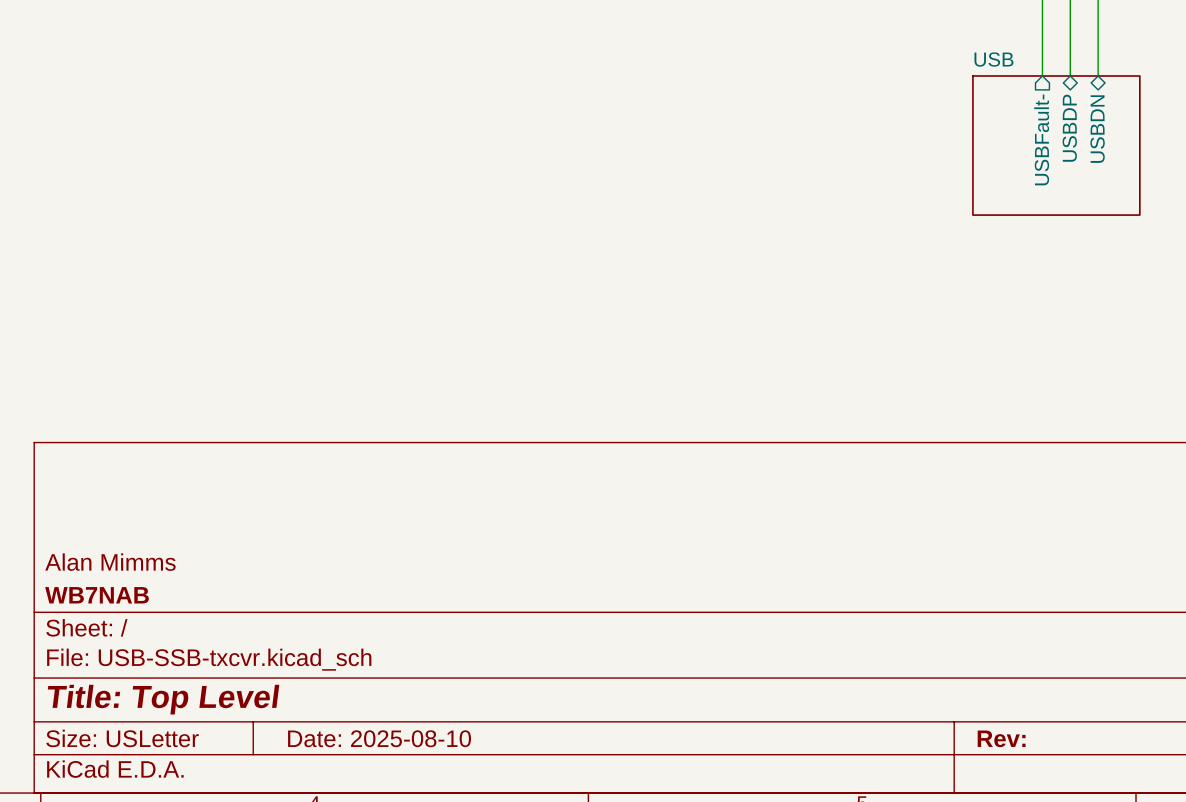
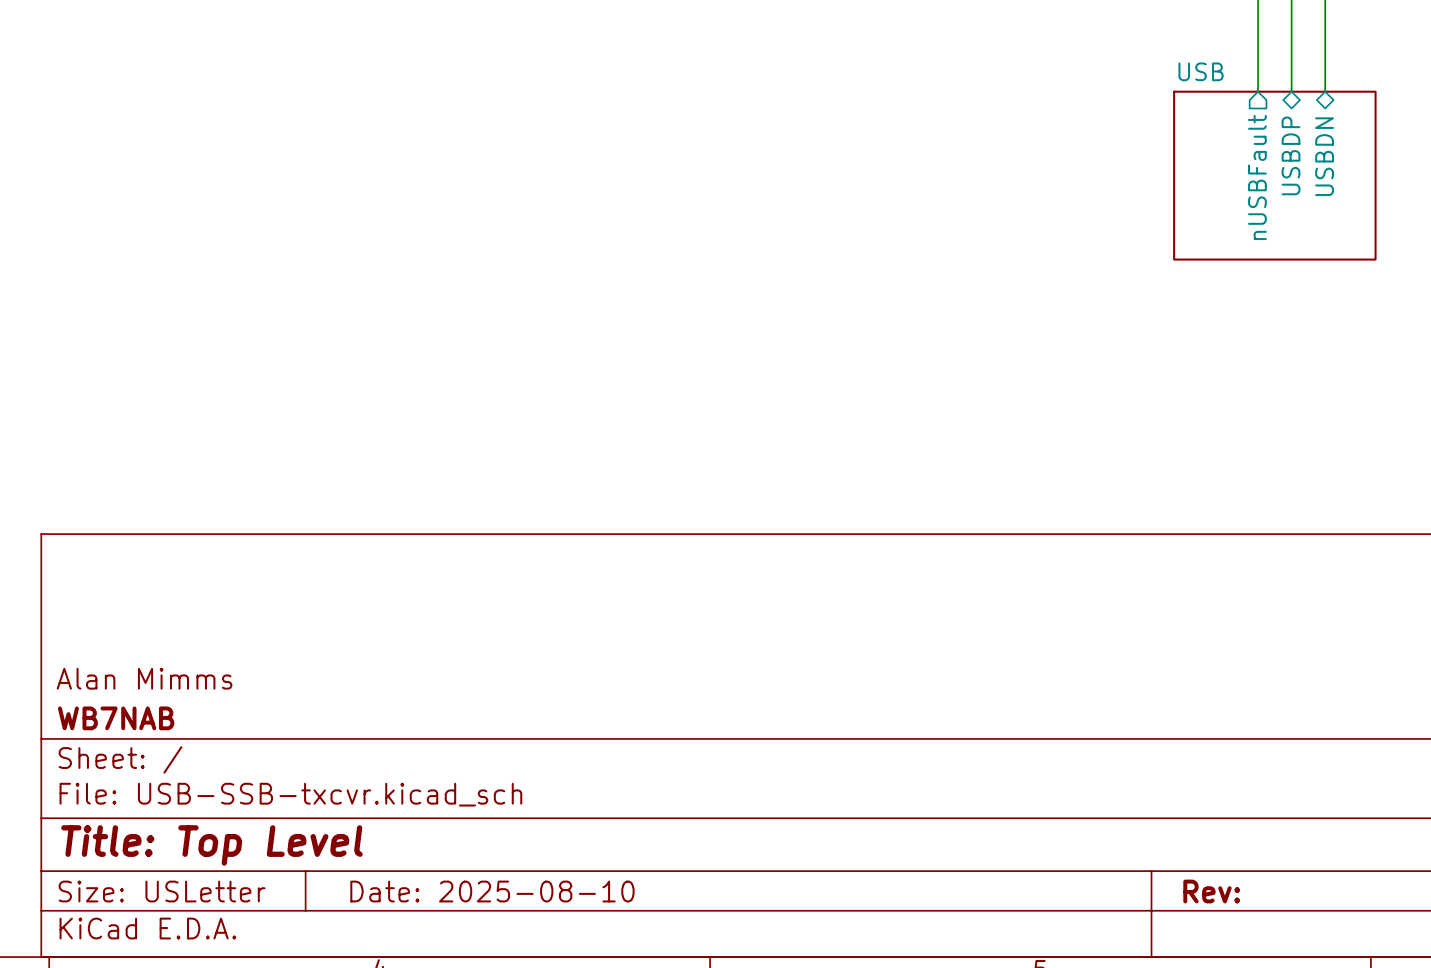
sheet pin: USBFault- (1041, 139) -> nUSBFault (1257, 177)

